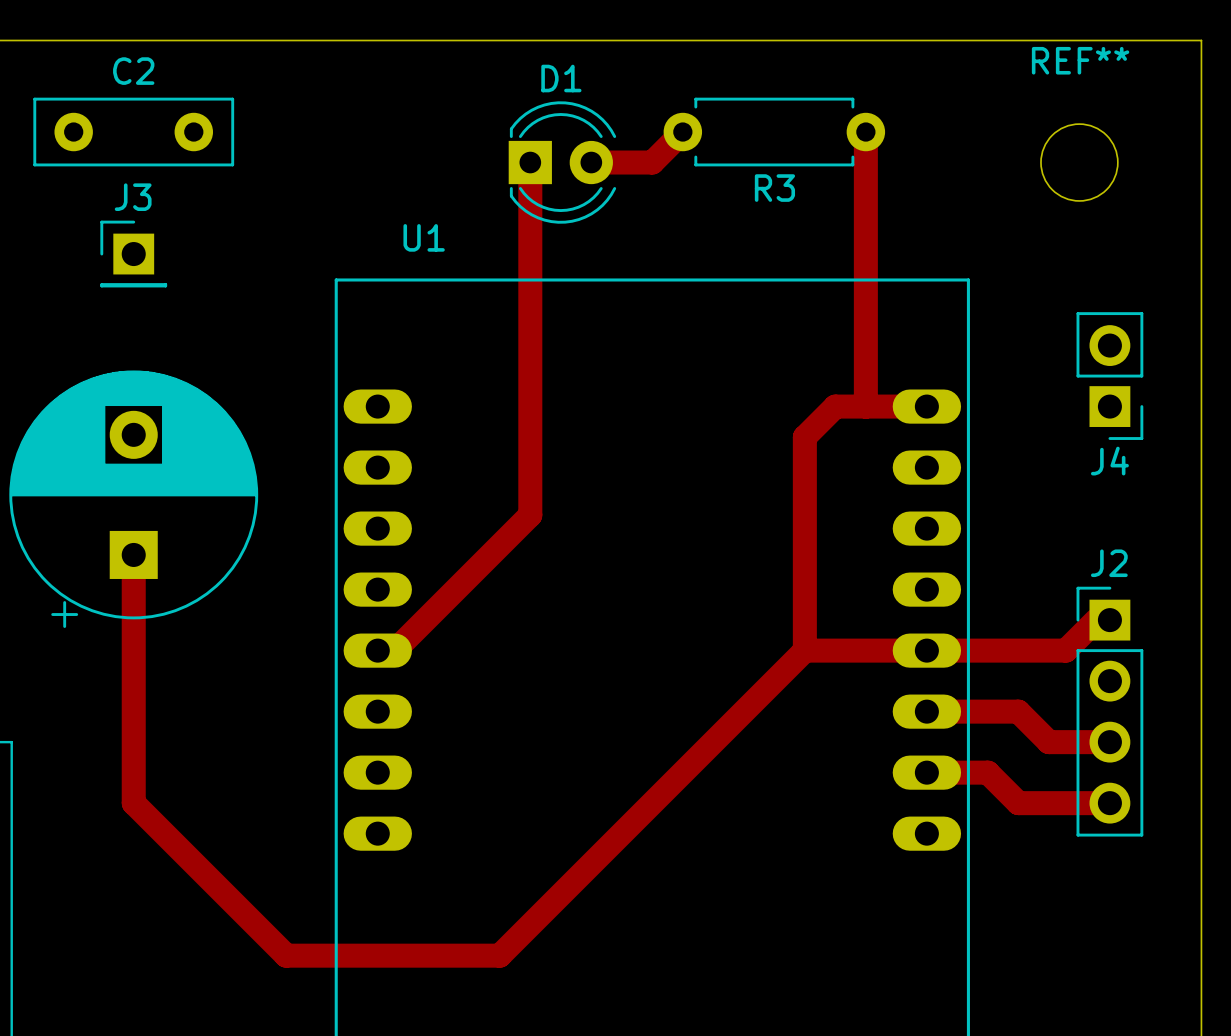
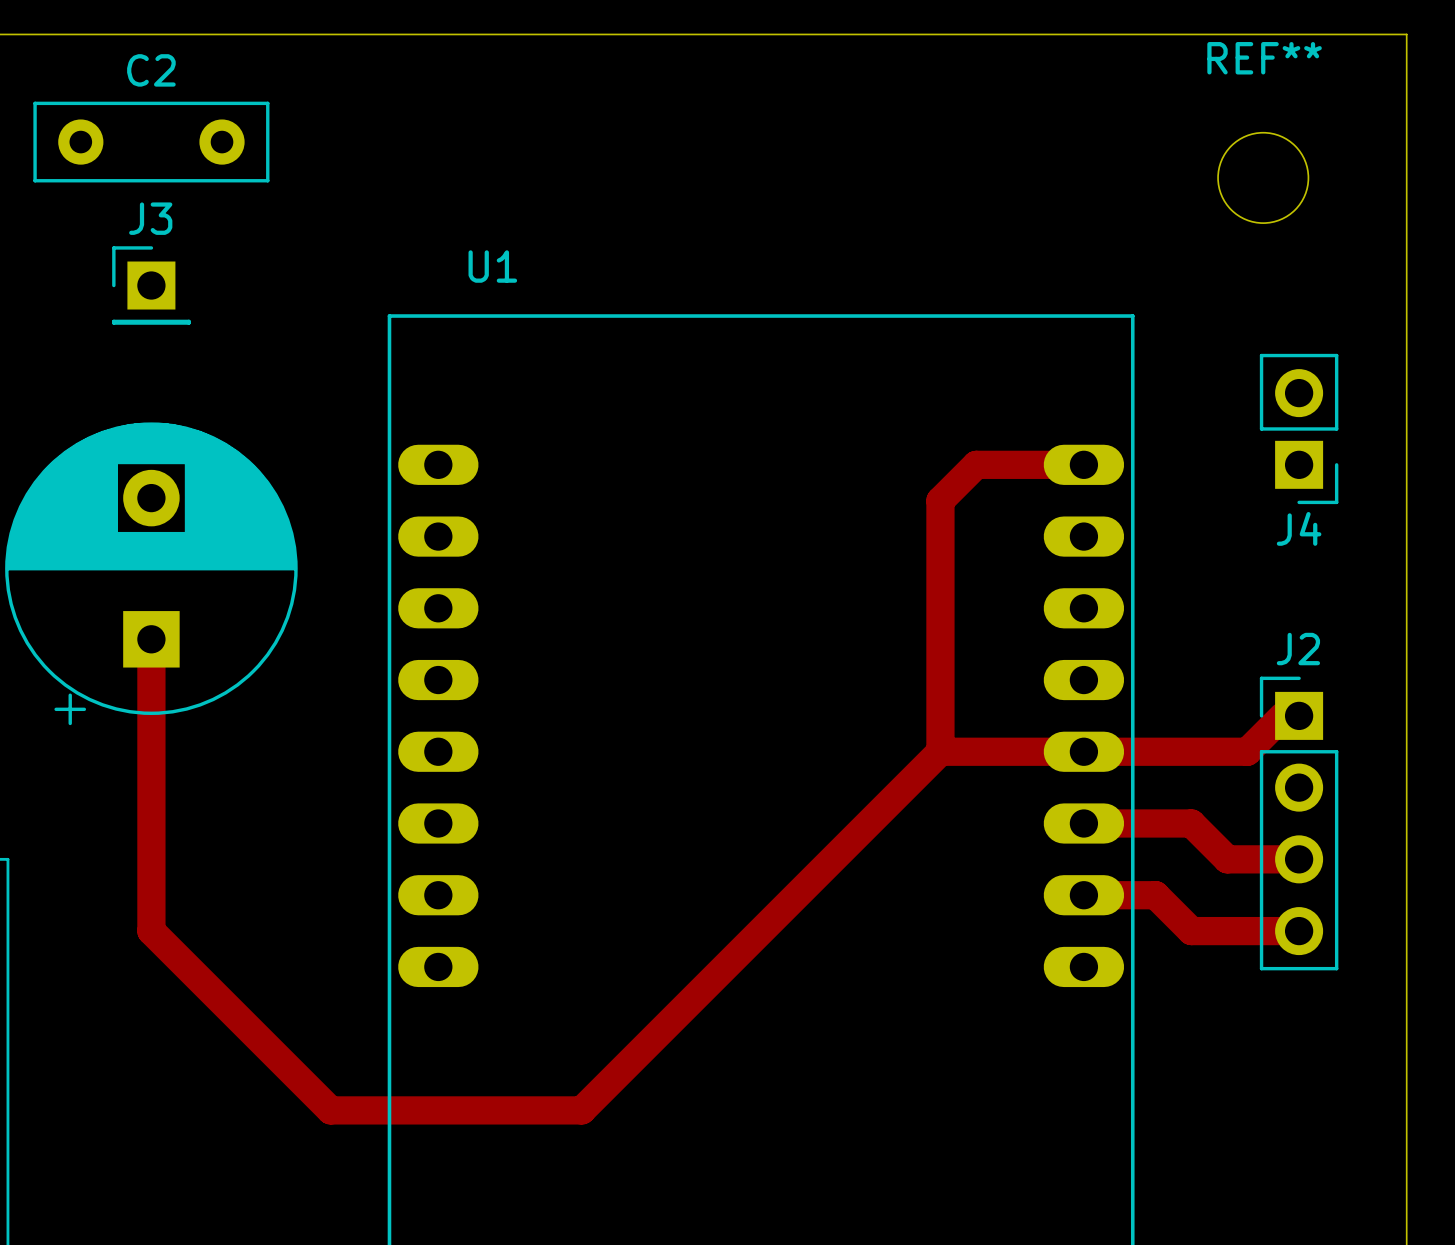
track: (682, 132) (652, 162) (591, 162) -> none
R3: (774, 132) -> none
track: (865, 132) (865, 406) -> none
track: (530, 162) (530, 515) (394, 650) (377, 650) -> none
D1: (562, 162) -> none

